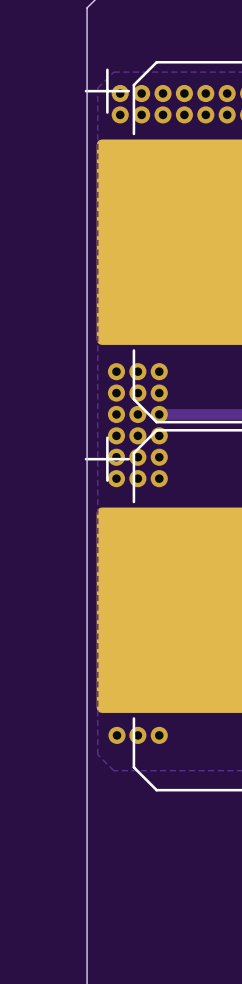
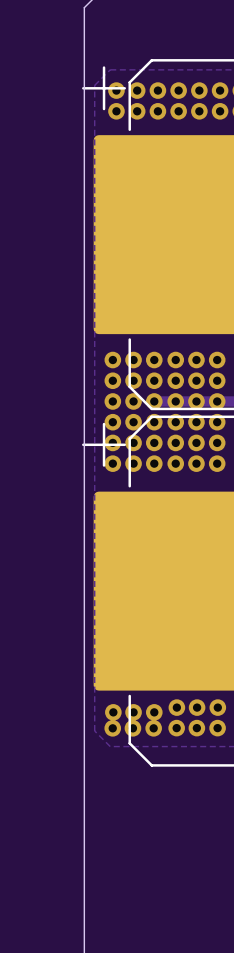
via: none -> (175, 360)
via: none -> (196, 360)
via: none -> (217, 360)
via: none -> (175, 380)
via: none -> (196, 380)
via: none -> (217, 380)
via: none -> (175, 401)
via: none -> (196, 401)
via: none -> (217, 401)
via: none -> (175, 422)
via: none -> (196, 422)
via: none -> (217, 422)
via: none -> (175, 442)
via: none -> (196, 442)
via: none -> (217, 442)
via: none -> (175, 463)
via: none -> (196, 463)
via: none -> (217, 463)
via: none -> (176, 707)
via: none -> (197, 707)
via: none -> (217, 707)
via: none -> (112, 728)
via: none -> (132, 728)
via: none -> (153, 728)
via: none -> (176, 728)
via: none -> (196, 728)
via: none -> (217, 728)

